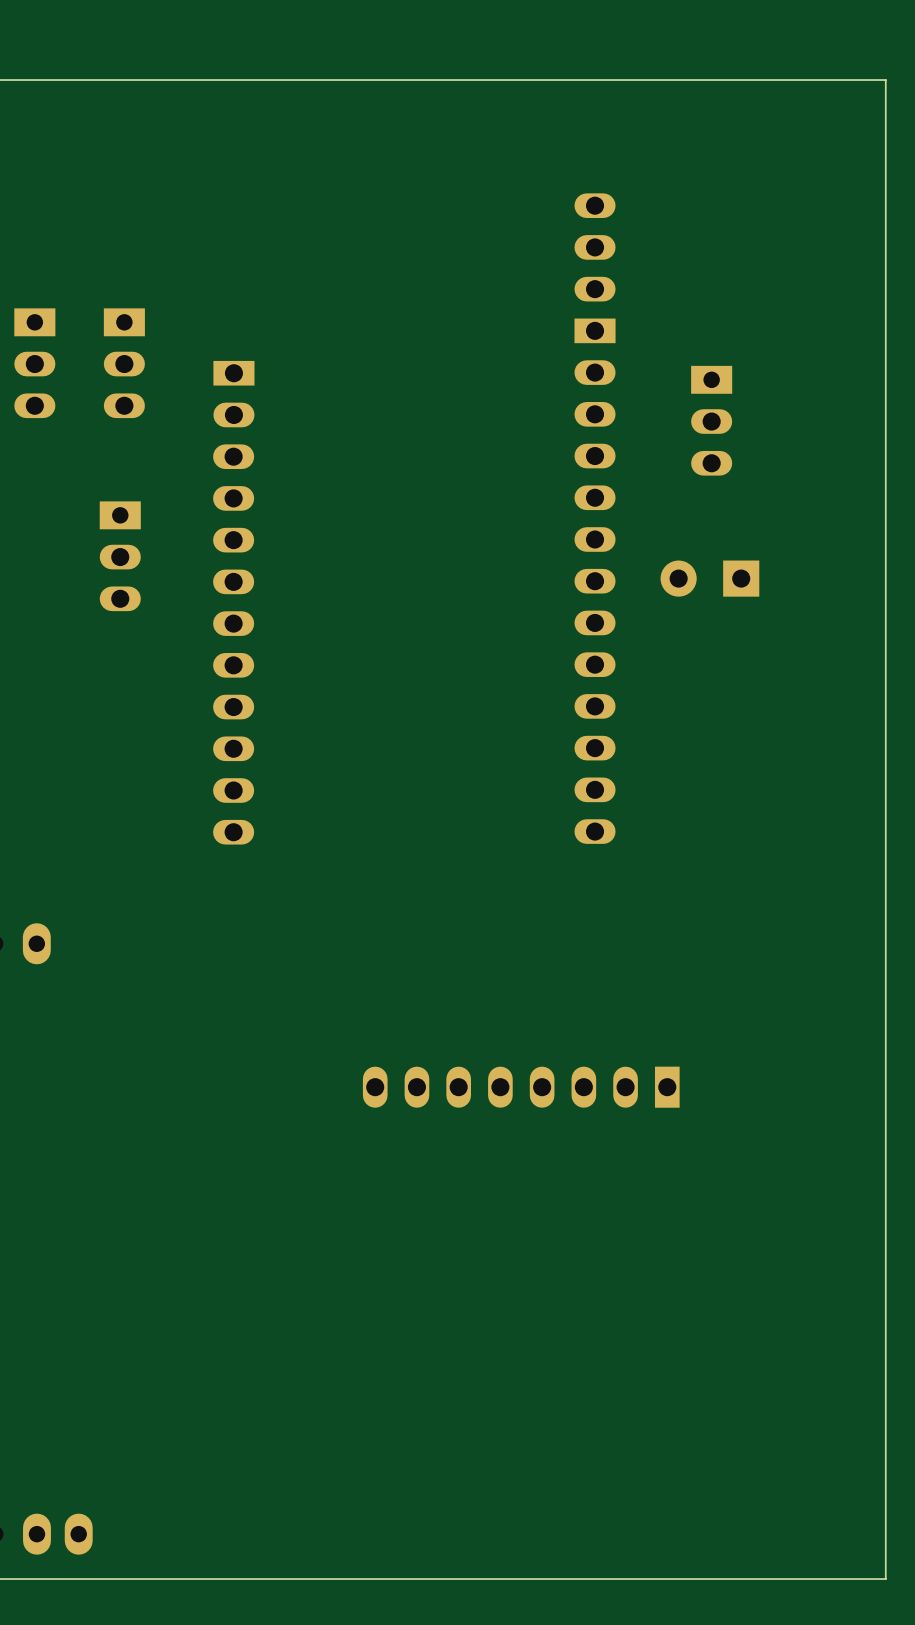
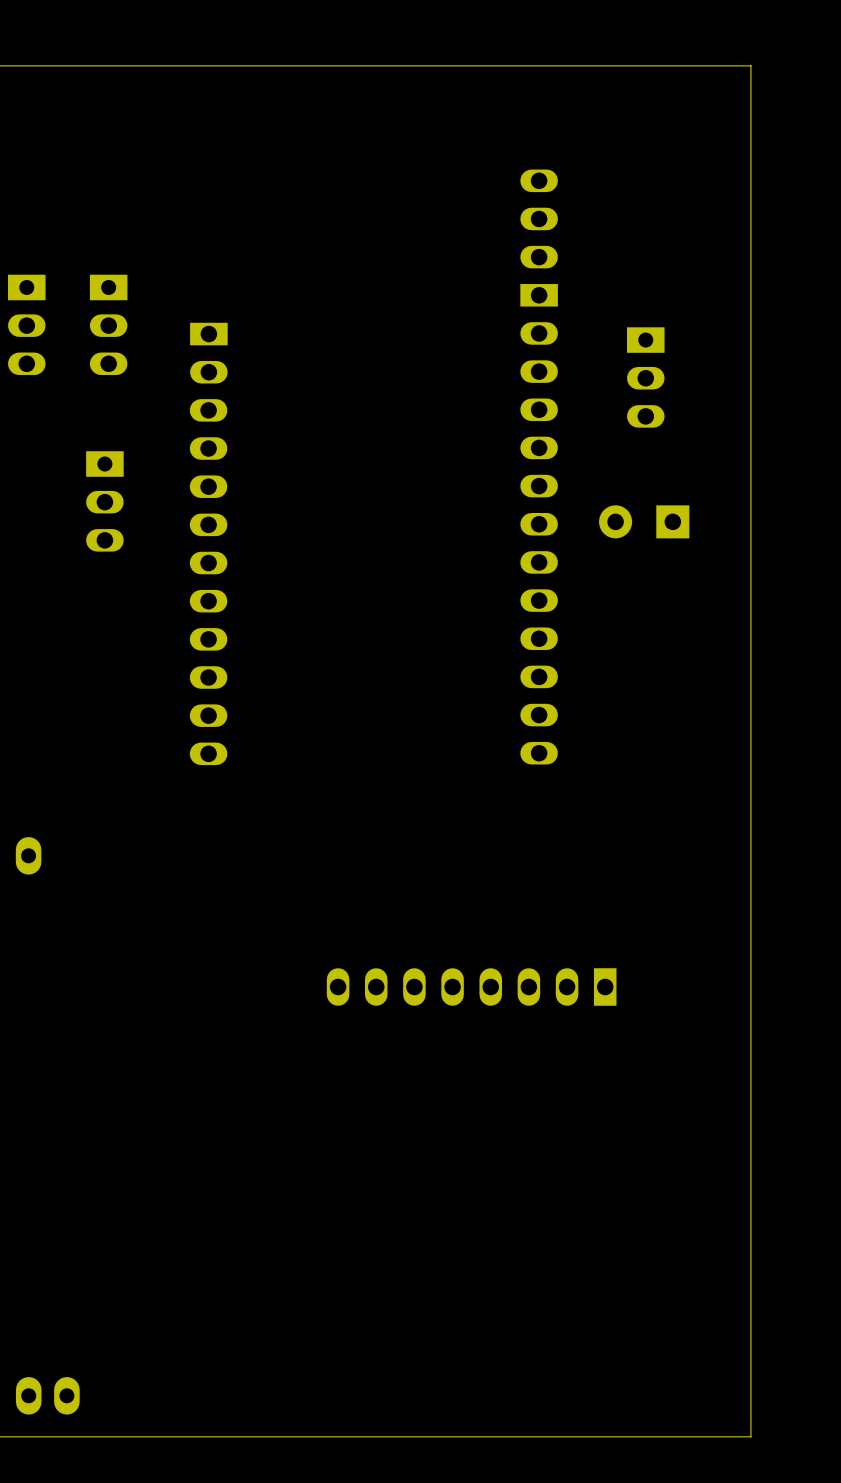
board edge: (826, 80) (885, 80) (885, 1579) (826, 1579) -> (750, 65) (750, 1436)

